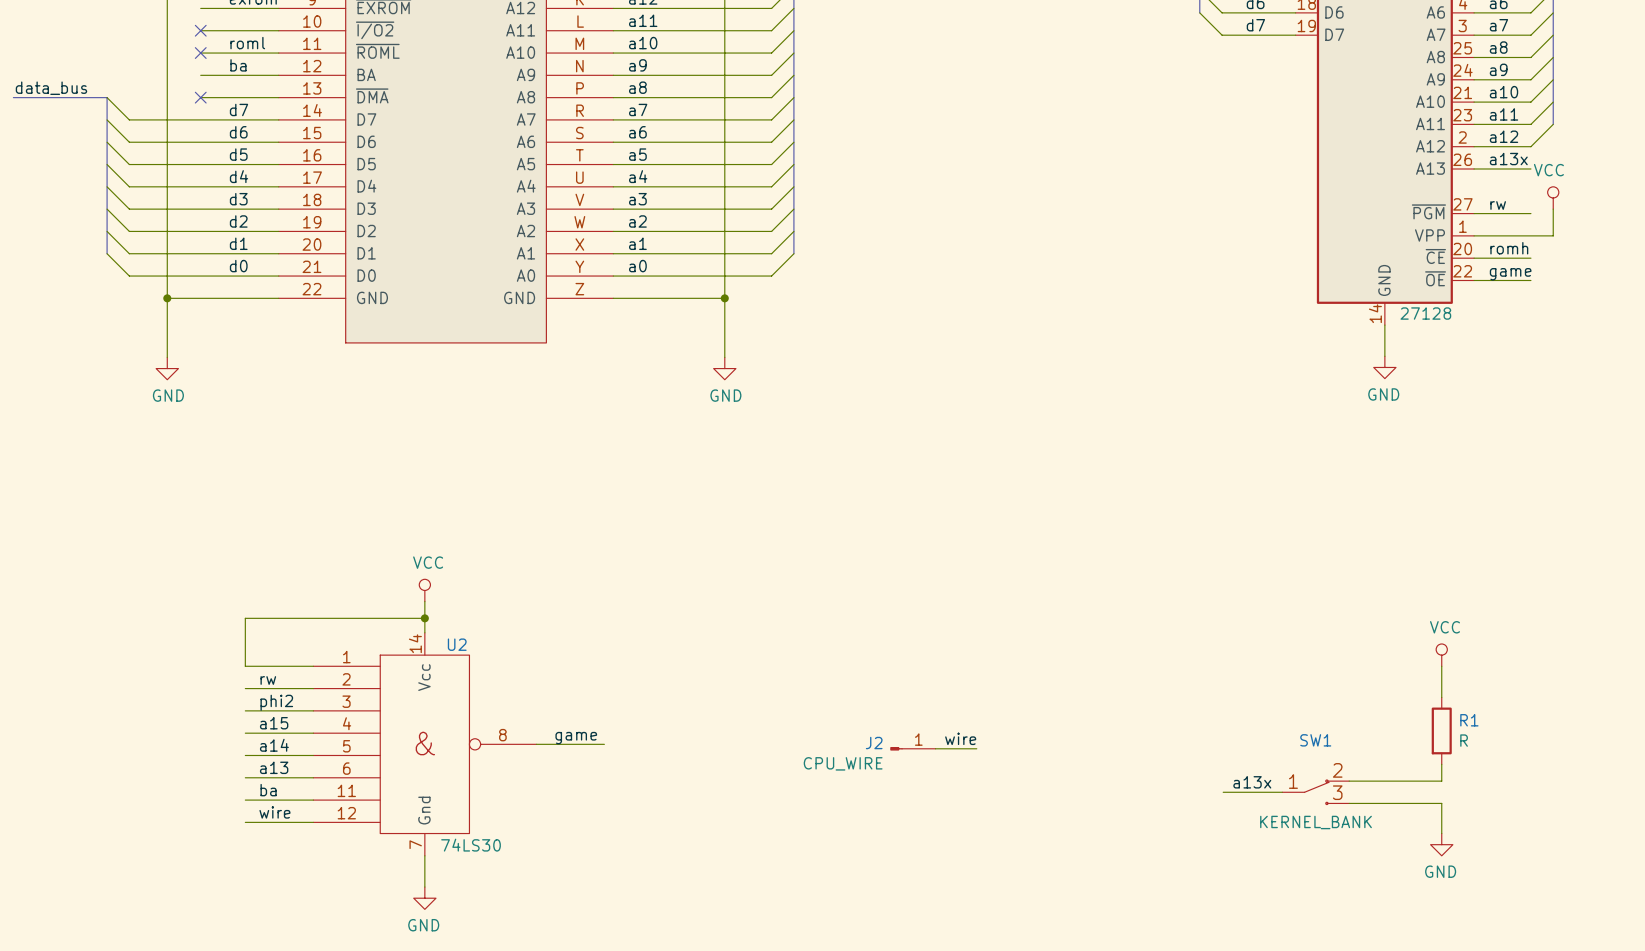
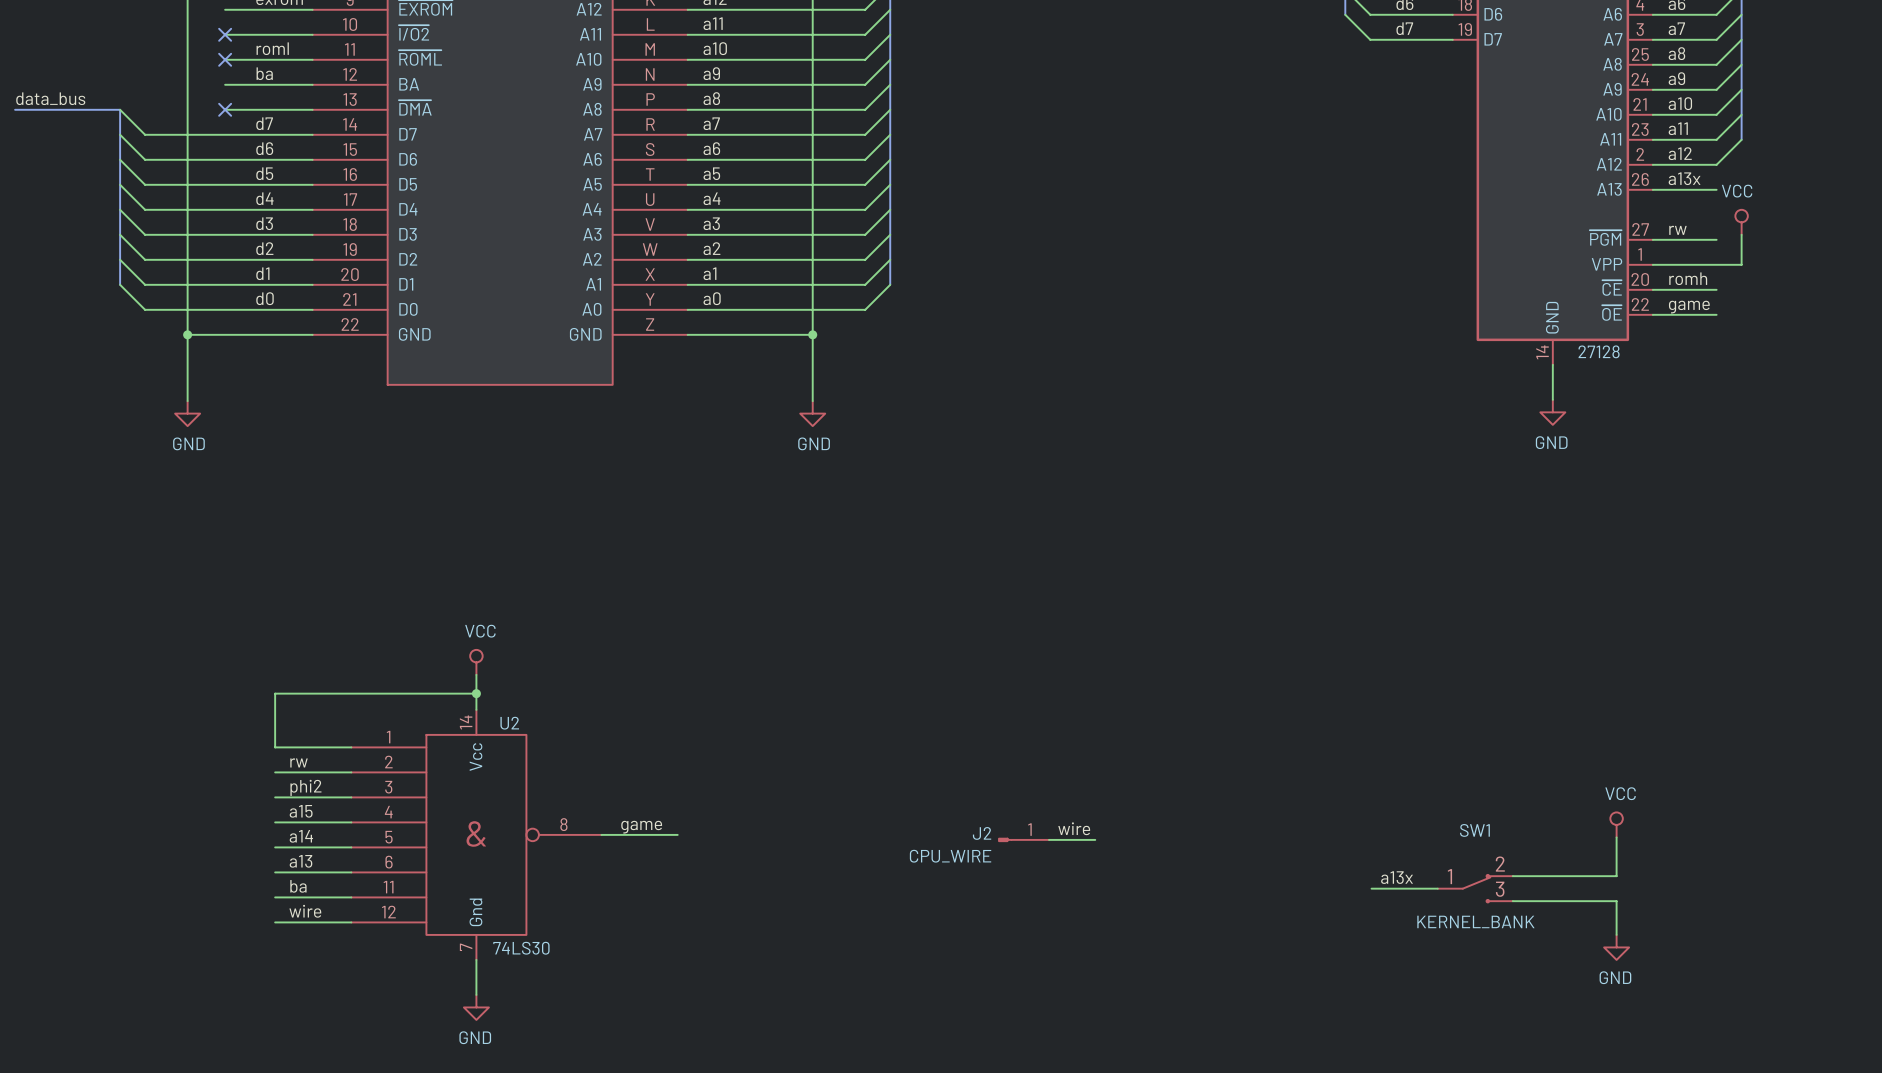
power symbol position: VCC (1441, 655) -> VCC (1616, 824)
wire: (1441, 666) (1441, 697) -> none
R1: R (1441, 730) -> none

